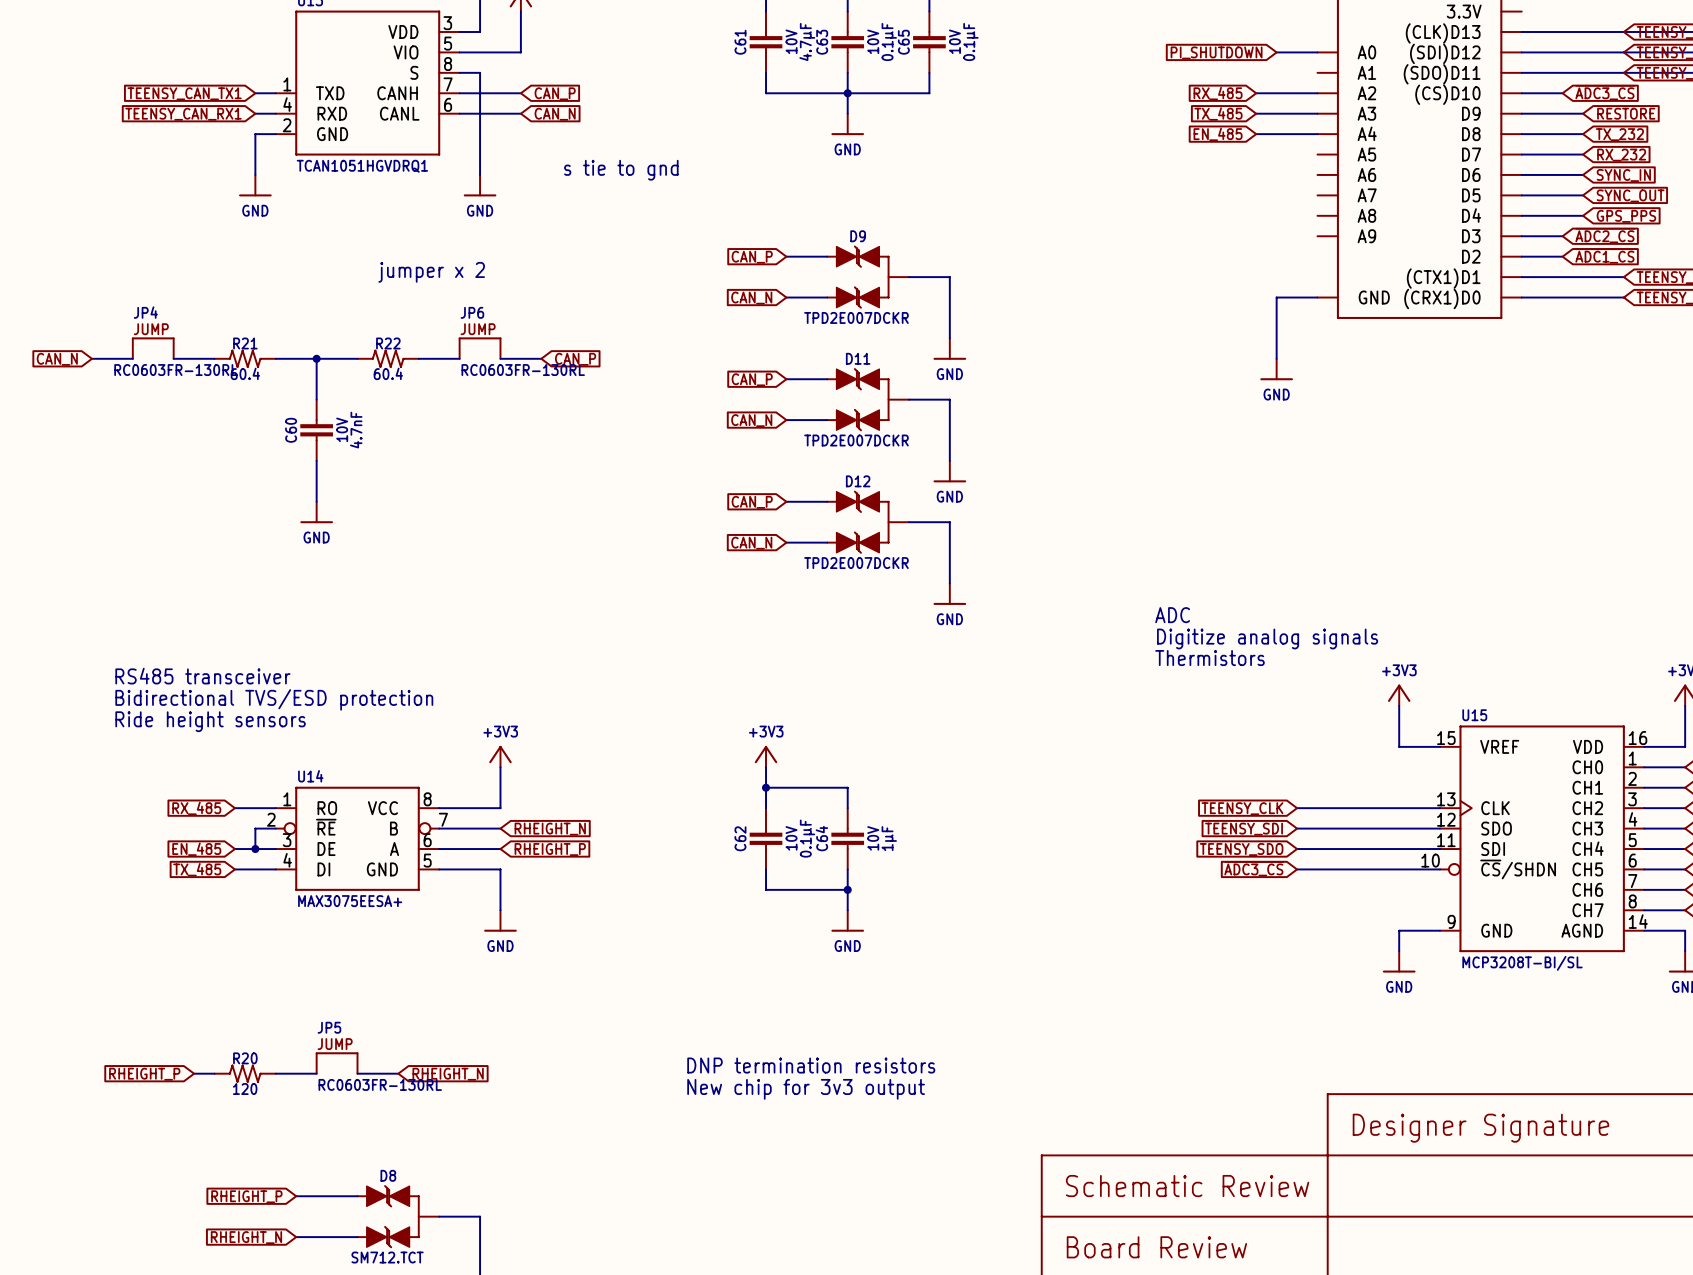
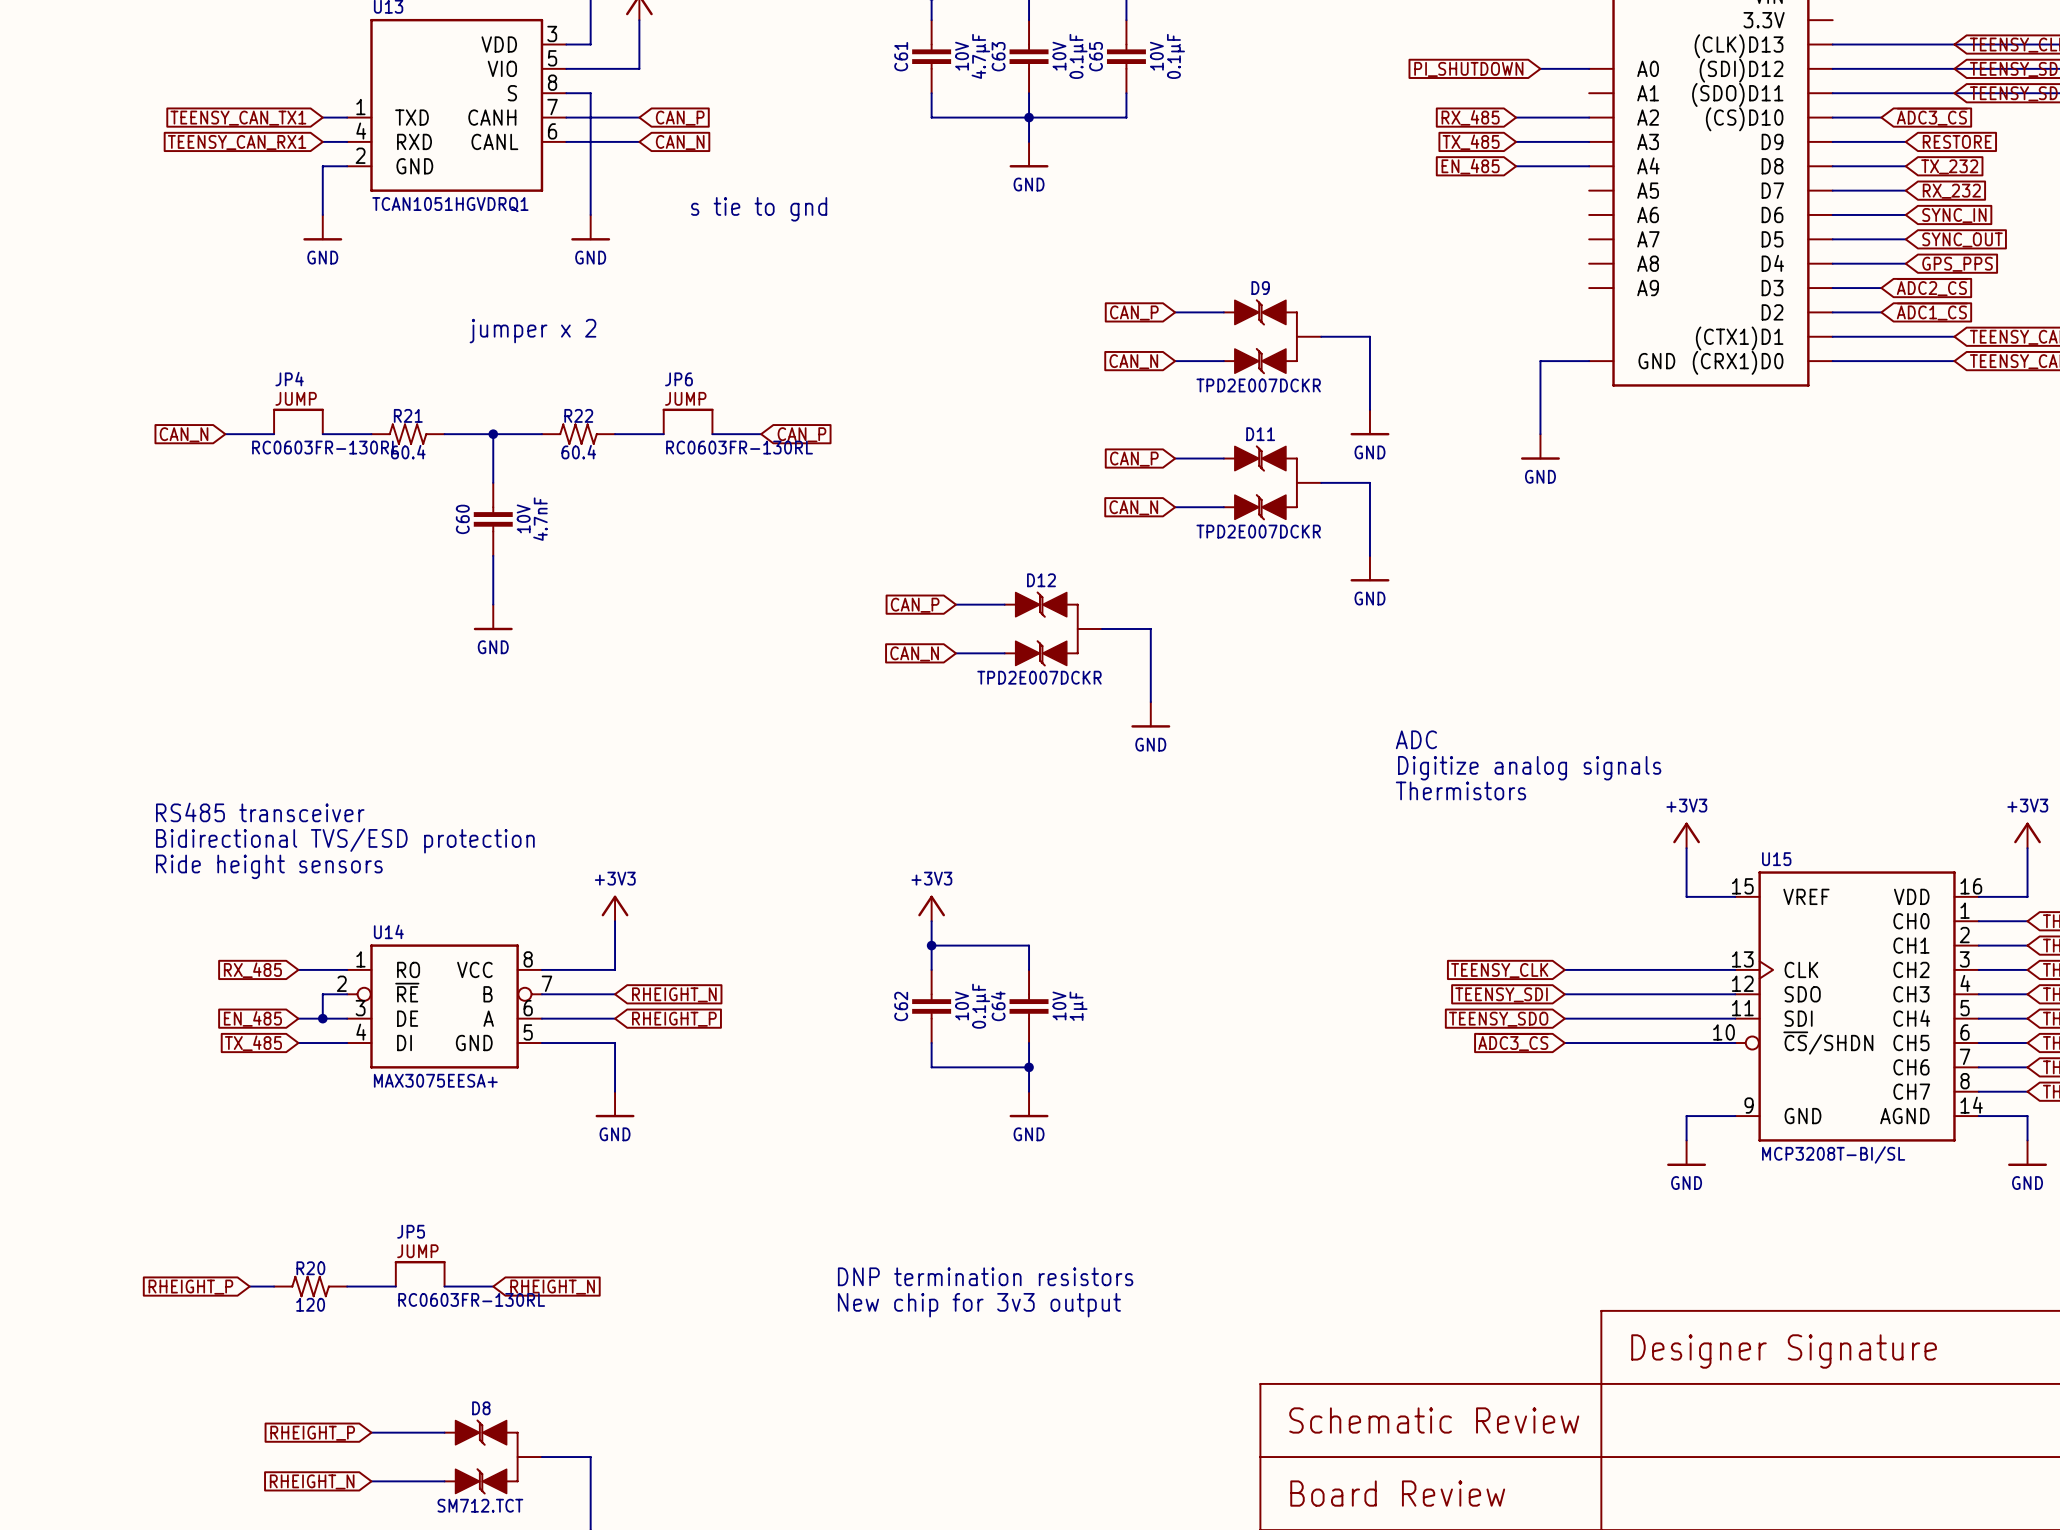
wire: (786, 256) (827, 256) -> (1175, 312) (1223, 312)
global label: CAN_P (752, 257) -> none
global label: none -> CAN_P (1134, 312)
D9 position: (868, 277) -> (1272, 336)
wire: (908, 277) (949, 277) (949, 338) -> (1321, 336) (1369, 336) (1369, 409)
wire: (786, 297) (827, 297) -> (1175, 361) (1223, 361)
global label: CAN_N (751, 298) -> none
global label: none -> CAN_N (1133, 361)
JP4 position: (153, 348) -> (298, 421)
JP6 position: (480, 348) -> (688, 421)
power symbol: GND (949, 349) -> none
power symbol: none -> GND (1369, 422)
wire: (91, 358) (132, 358) -> none
R21 position: (245, 358) -> (408, 434)
wire: (316, 358) (316, 399) -> (493, 434) (493, 482)
junction: (316, 358) -> none
R22 position: (388, 358) -> (578, 434)
junction: none -> (493, 434)
wire: none -> (712, 434) (761, 434)
global label position: CAN_N (57, 359) -> CAN_N (184, 434)
global label position: CAN_P (575, 359) -> CAN_P (801, 434)
global label: CAN_P (752, 379) -> none
wire: (786, 379) (827, 379) -> (1175, 458) (1223, 458)
global label: none -> CAN_P (1134, 459)
D11 position: (868, 399) -> (1272, 482)
wire: (908, 399) (949, 399) (949, 460) -> (1321, 482) (1369, 482) (1369, 555)
global label: CAN_N (751, 420) -> none
wire: (786, 420) (827, 420) -> (1175, 507) (1223, 507)
global label: none -> CAN_N (1133, 507)
C60 position: (316, 430) -> (493, 519)
wire: (316, 460) (316, 501) -> (493, 555) (493, 604)
power symbol: GND (949, 471) -> none
power symbol: none -> GND (1369, 568)
power symbol position: GND (316, 512) -> GND (493, 617)

